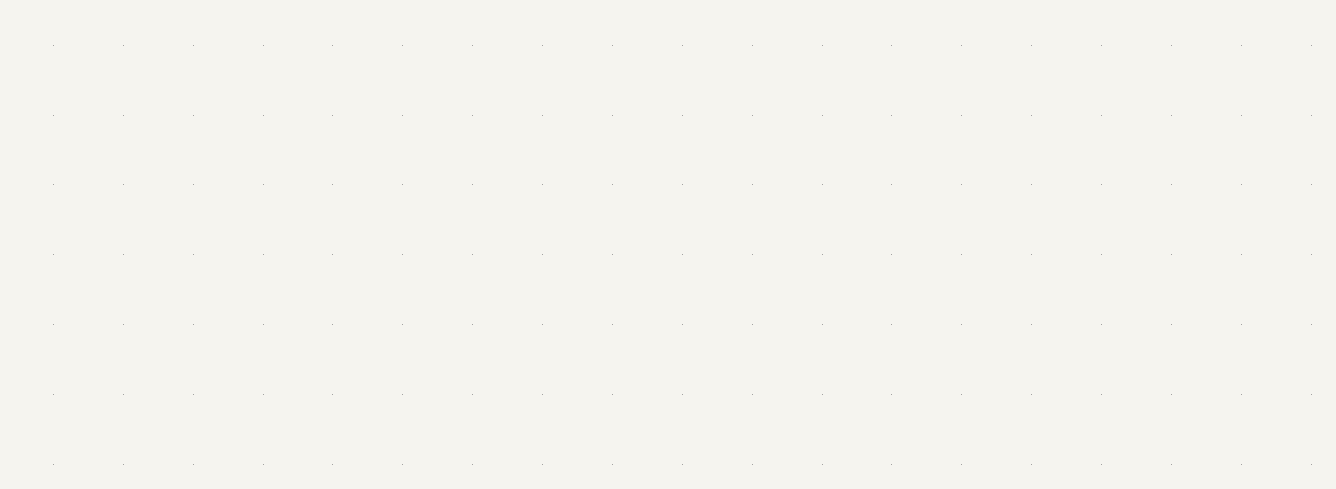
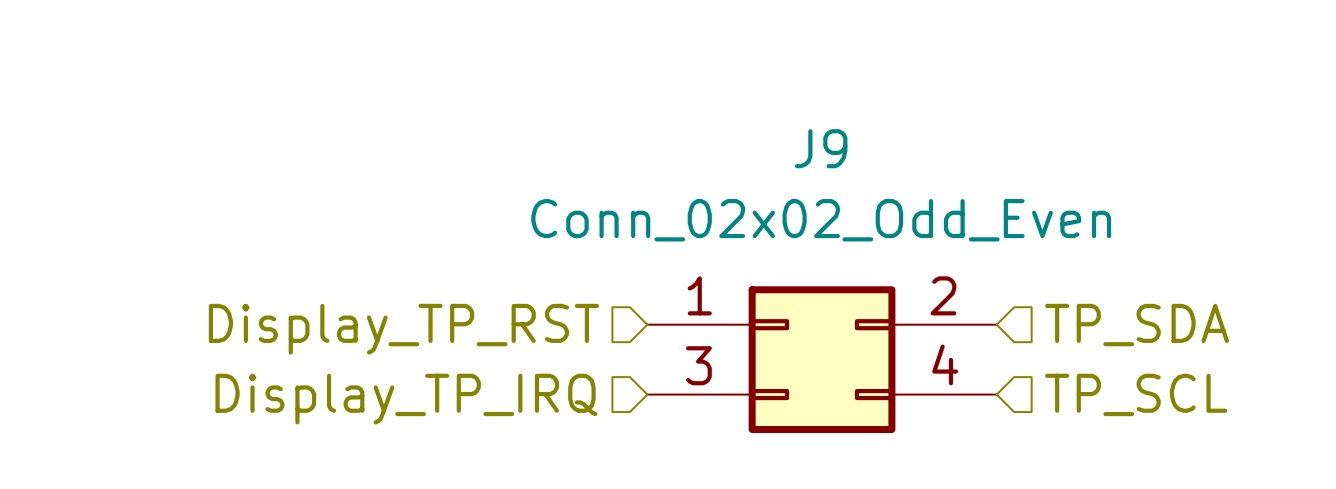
hierarchical label: none -> TP_SDA (1137, 325)
hierarchical label: none -> Display_TP_RST (403, 329)
J9: none -> Conn_02x02_Odd_Even (822, 359)
hierarchical label: none -> TP_SCL (1136, 394)
hierarchical label: none -> Display_TP_IRQ (406, 399)

